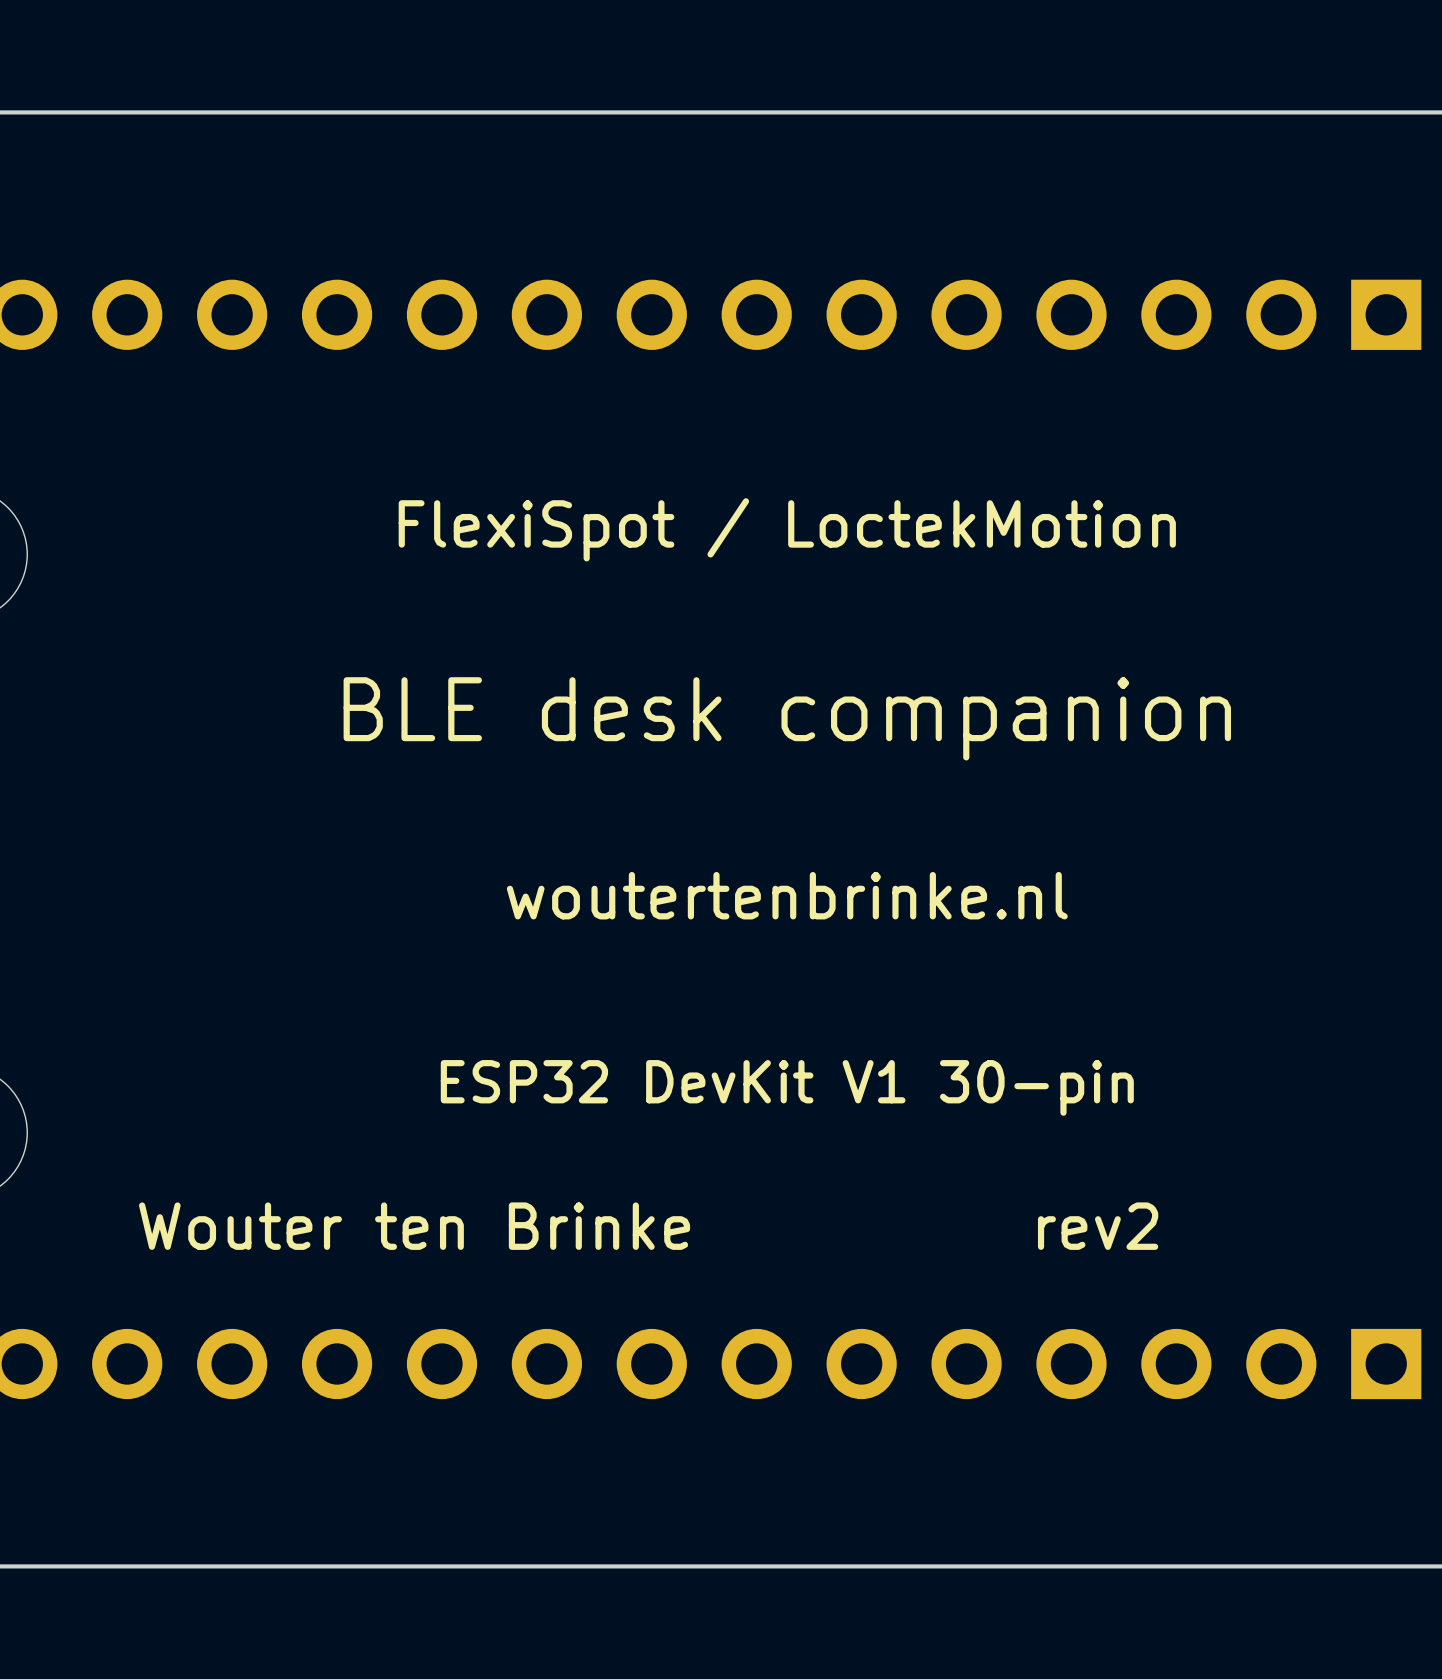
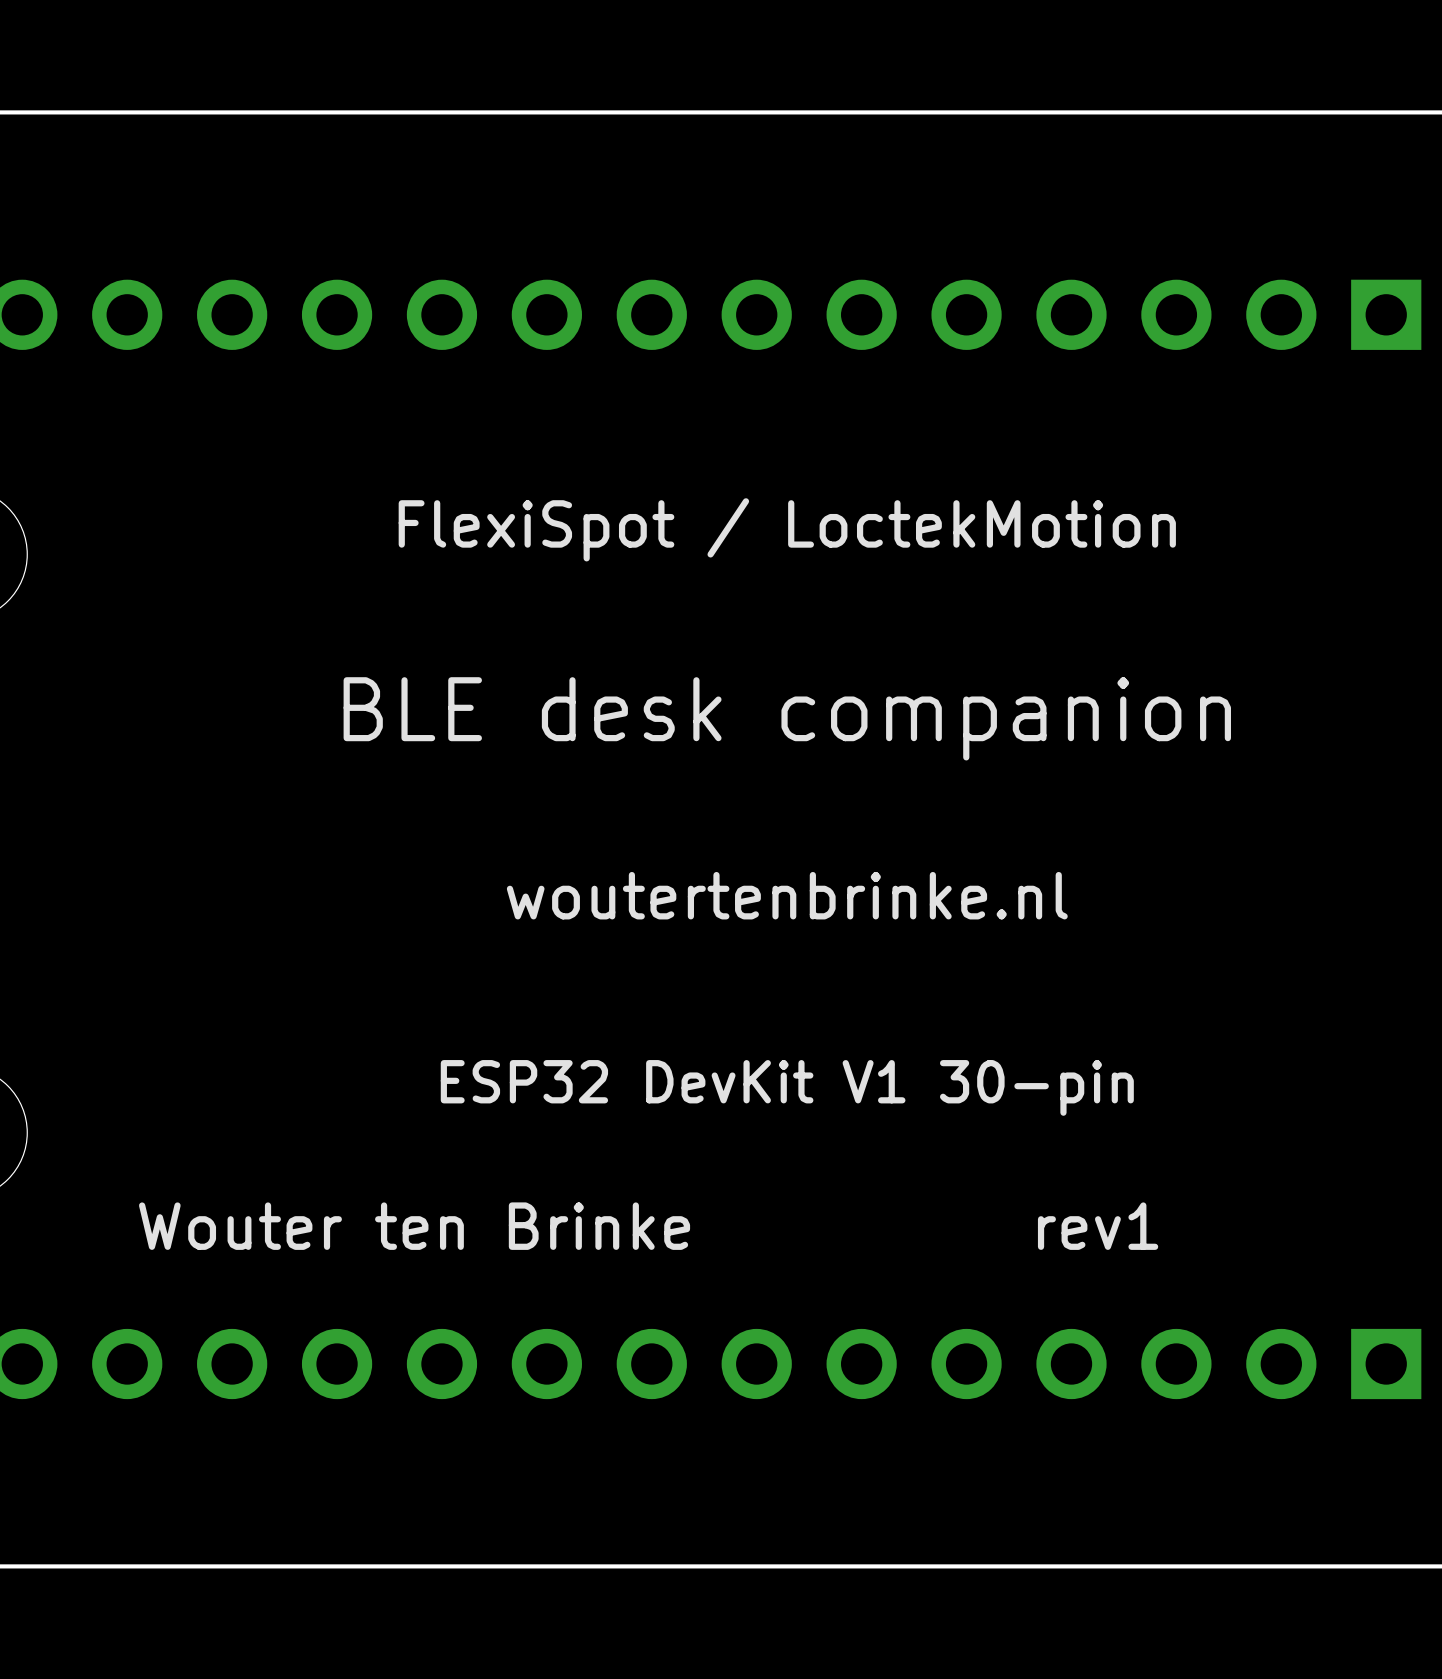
text: rev2 (1098, 1226) -> rev1 (1098, 1226)

